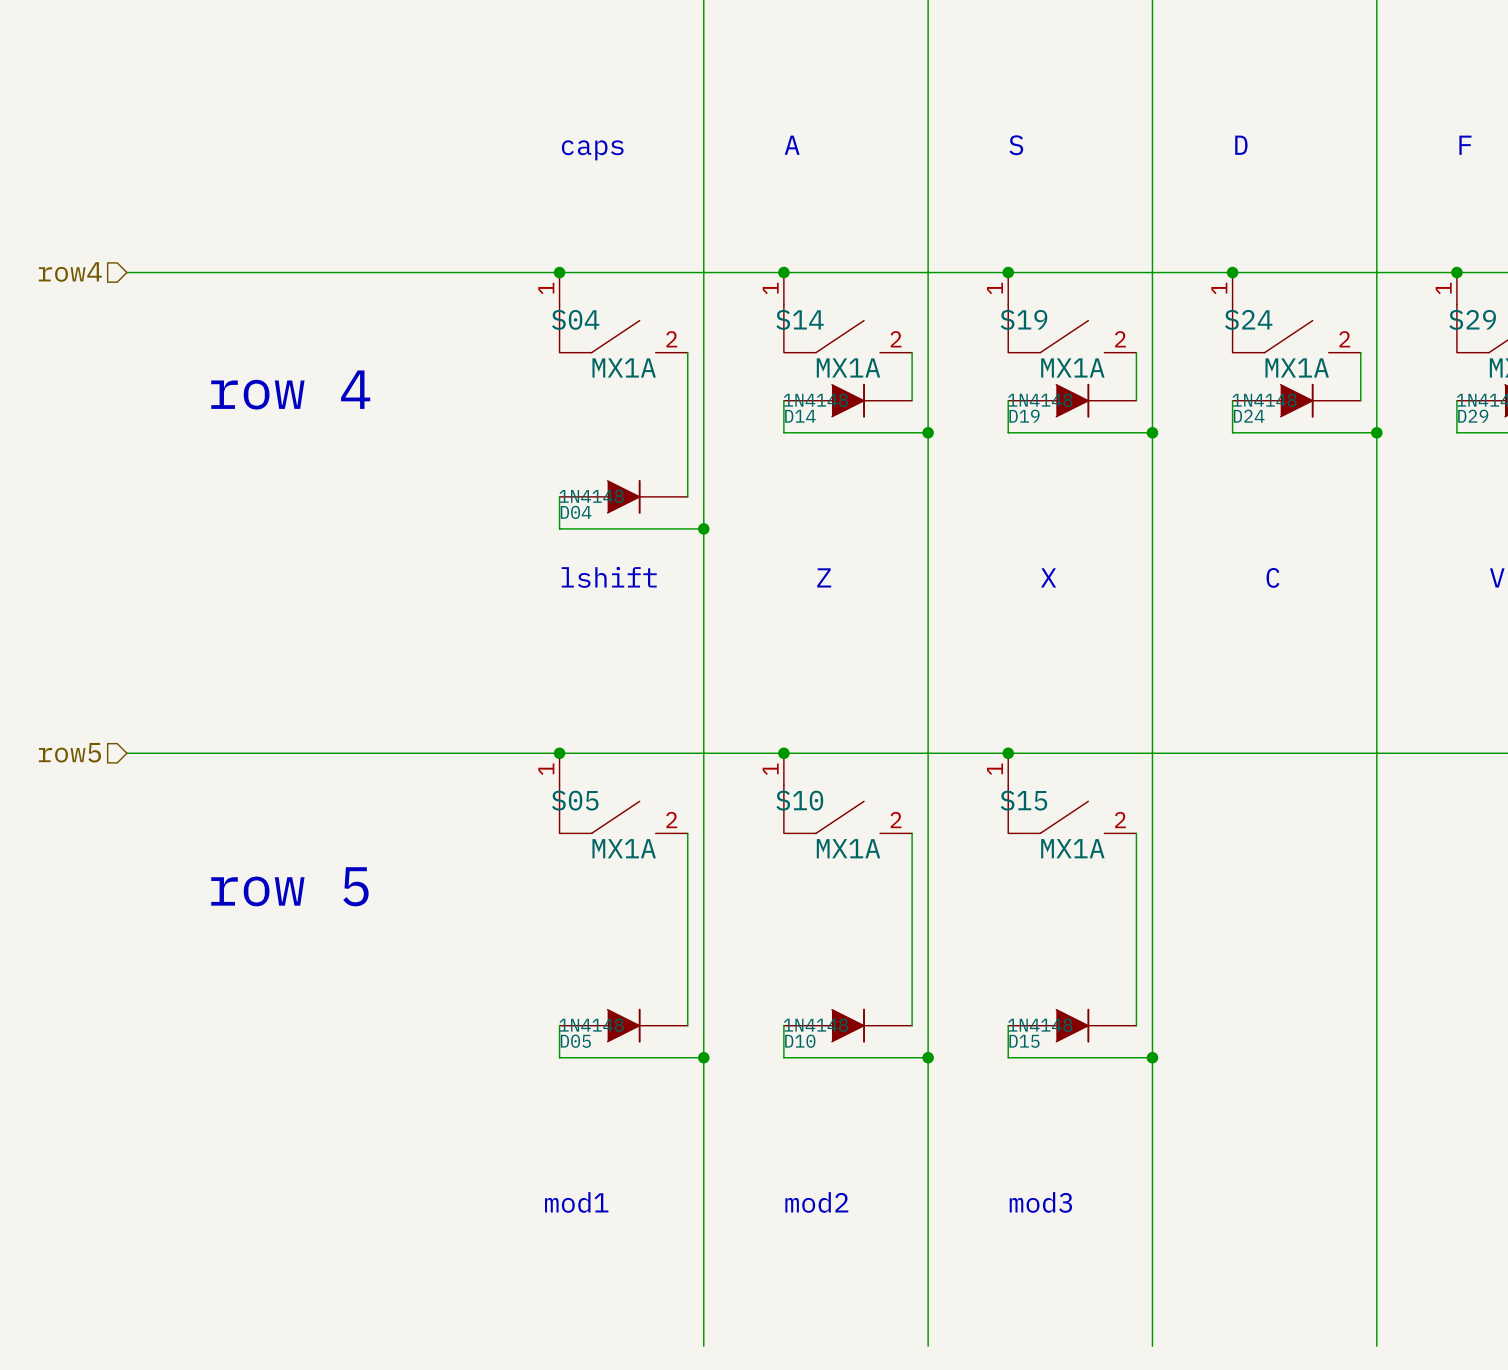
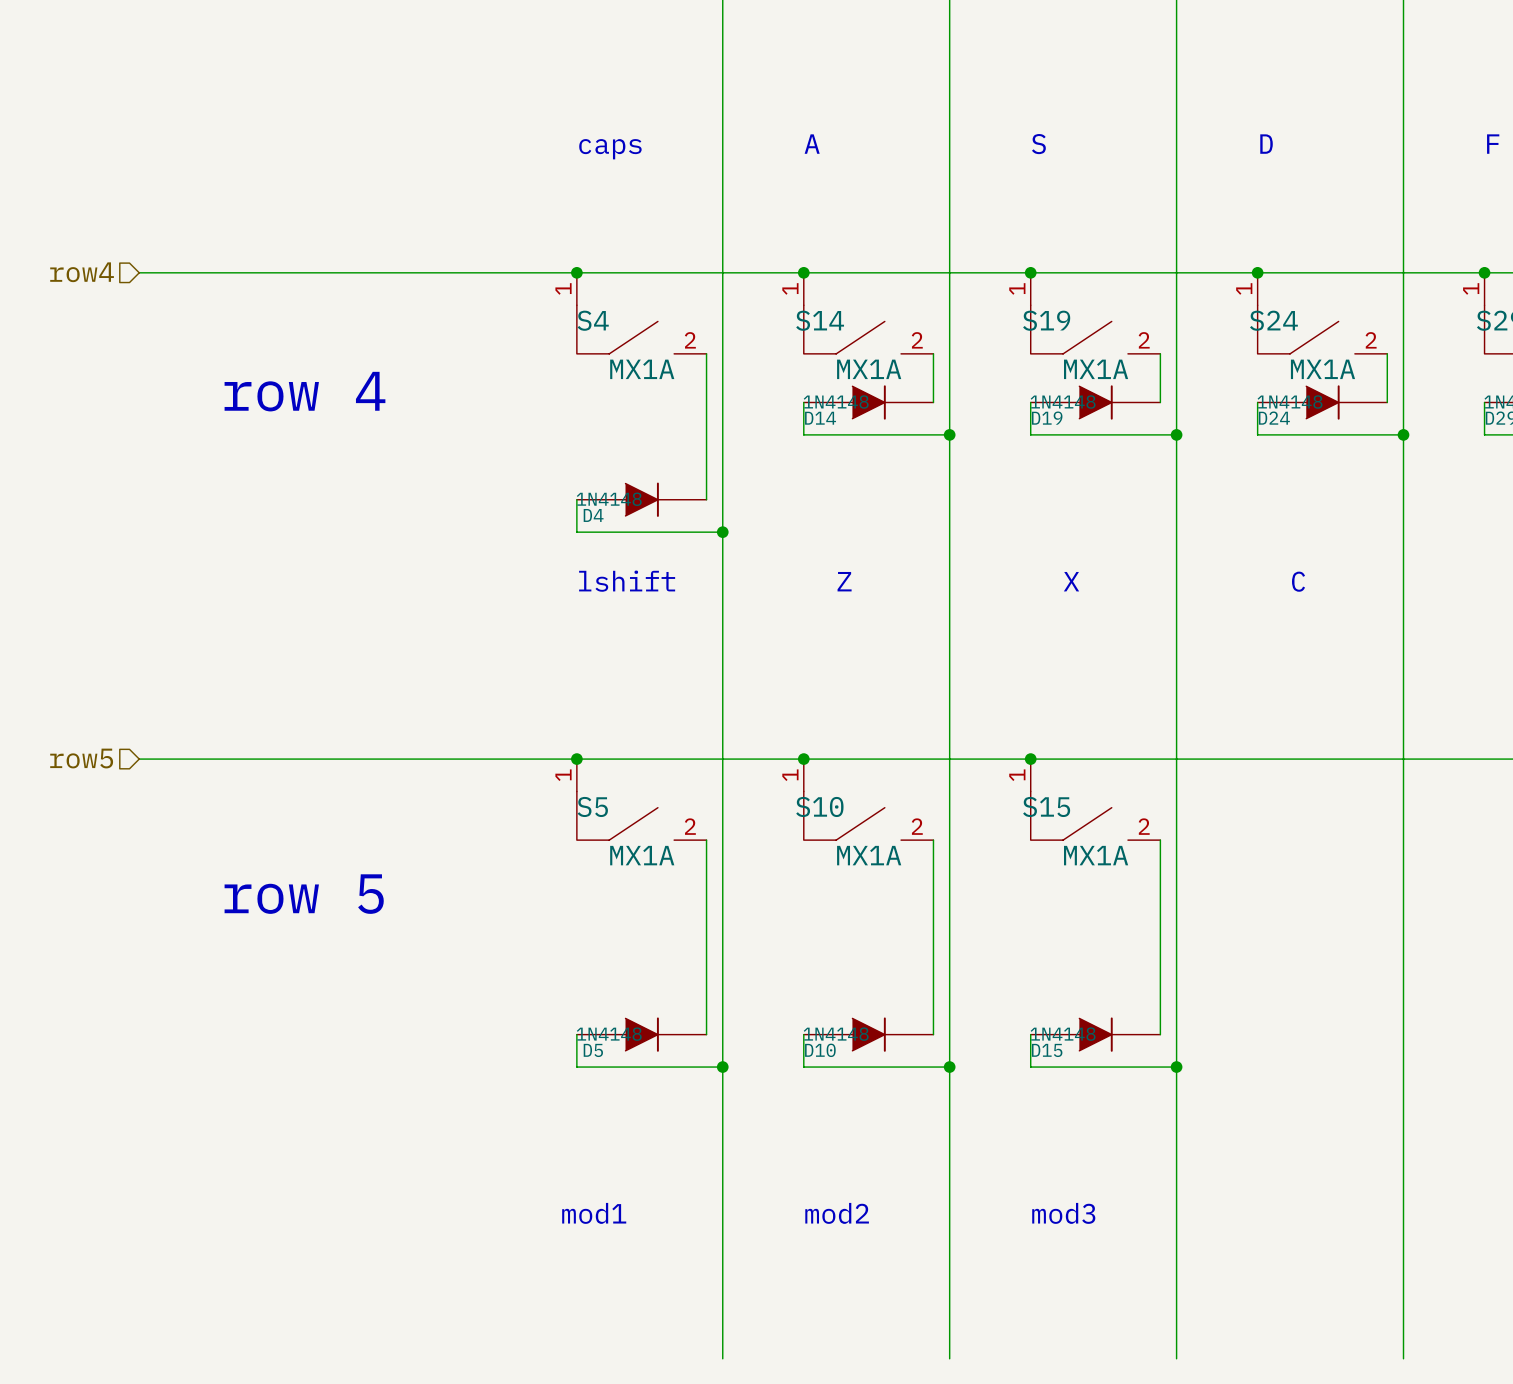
S04 name: S04 (575, 319) -> S4 (593, 320)
D04 name: D04 (576, 512) -> D4 (593, 515)
S05 name: S05 (575, 800) -> S5 (592, 806)
D05 name: D05 (575, 1041) -> D5 (593, 1050)

